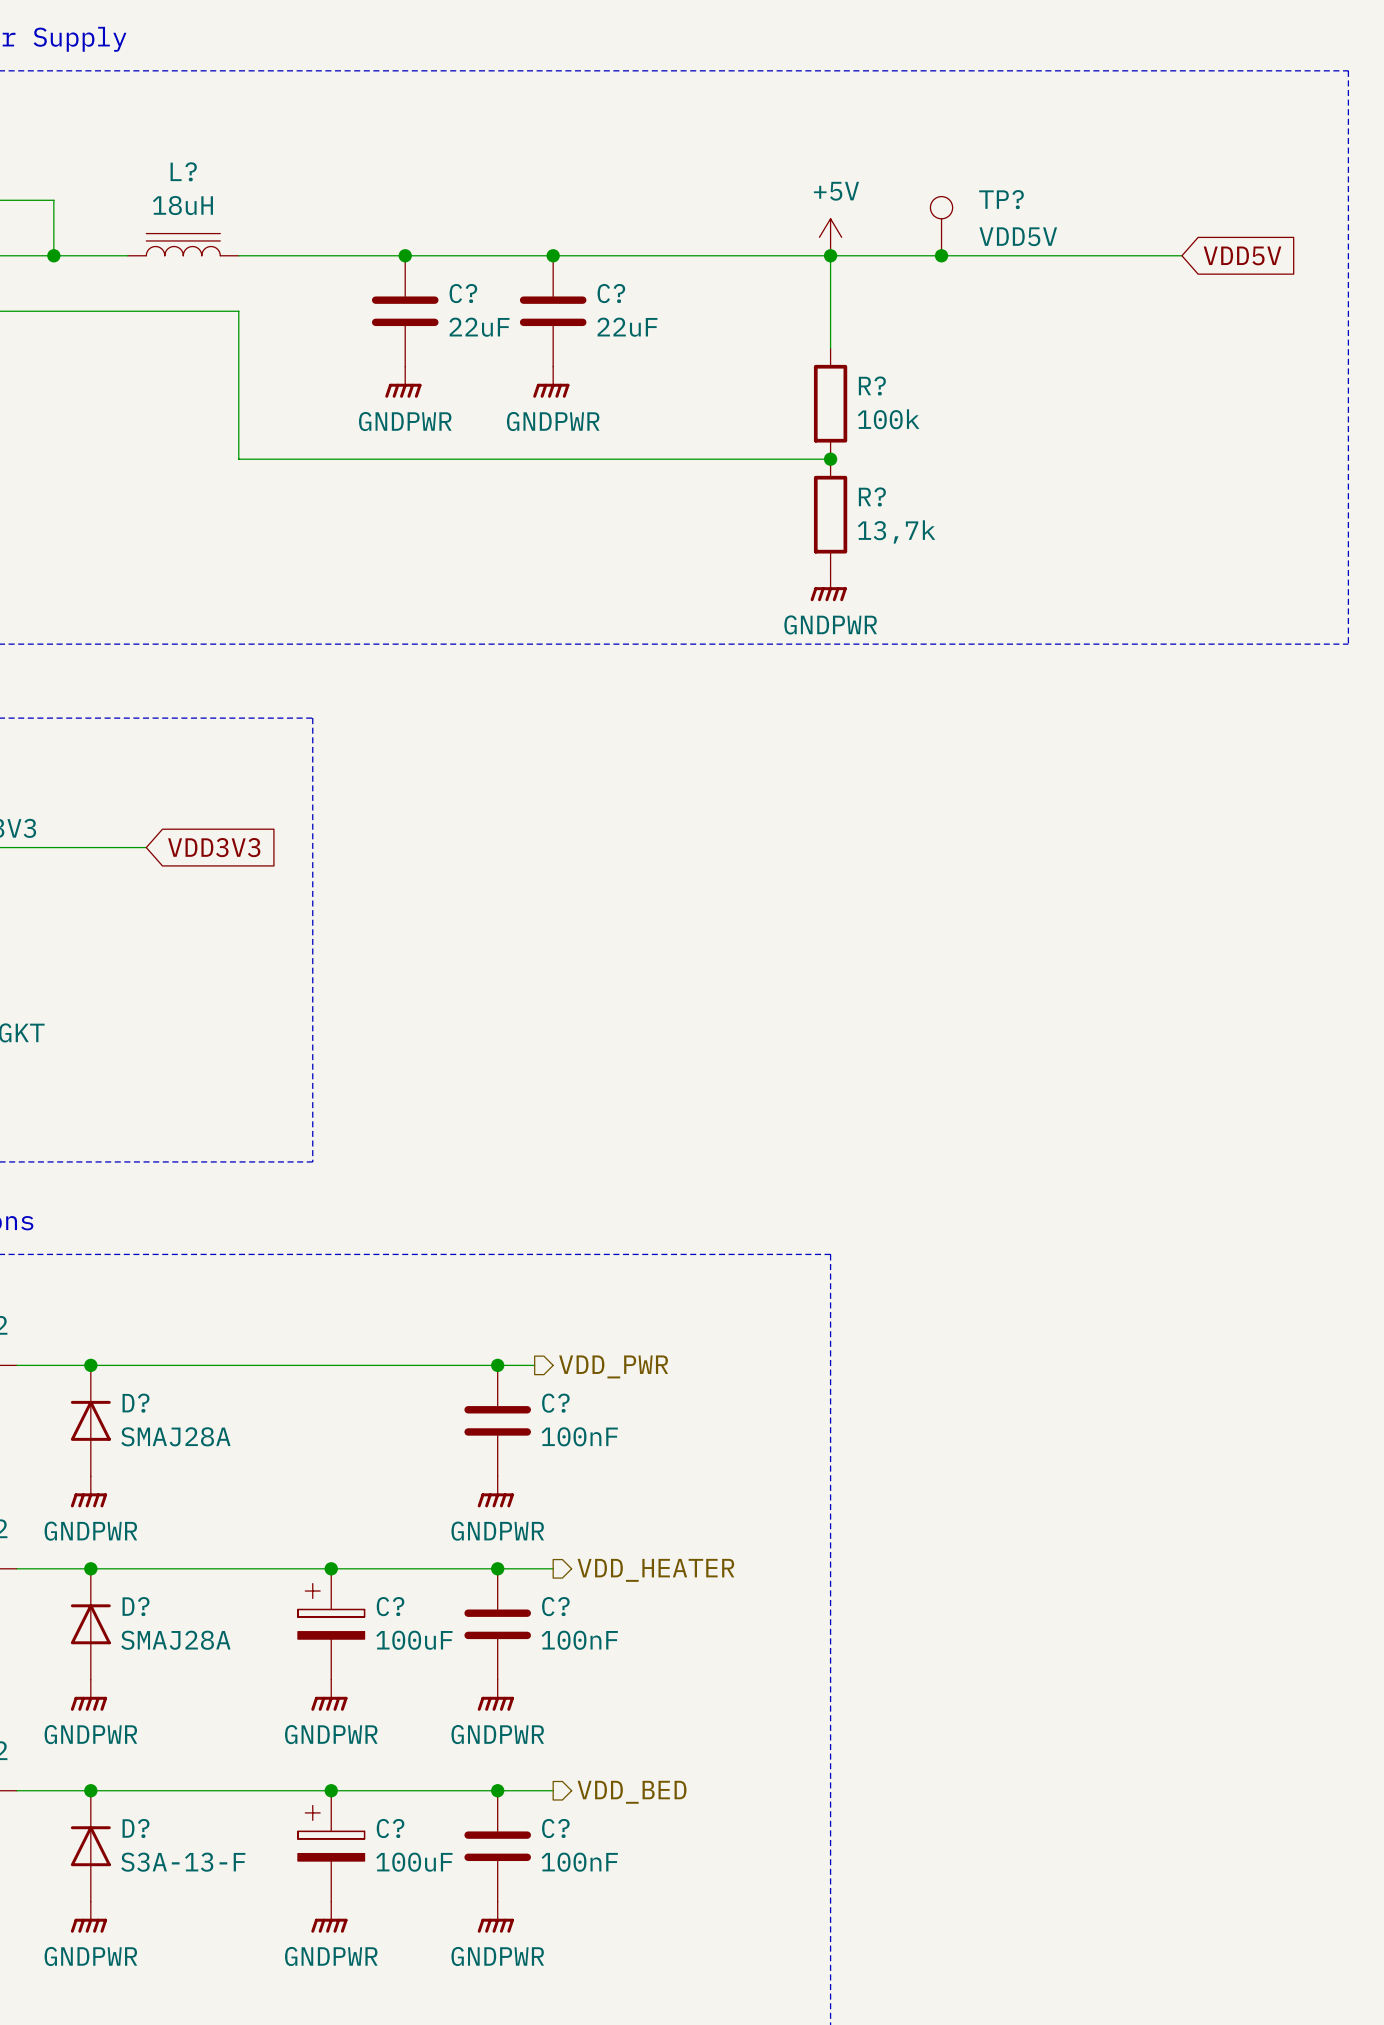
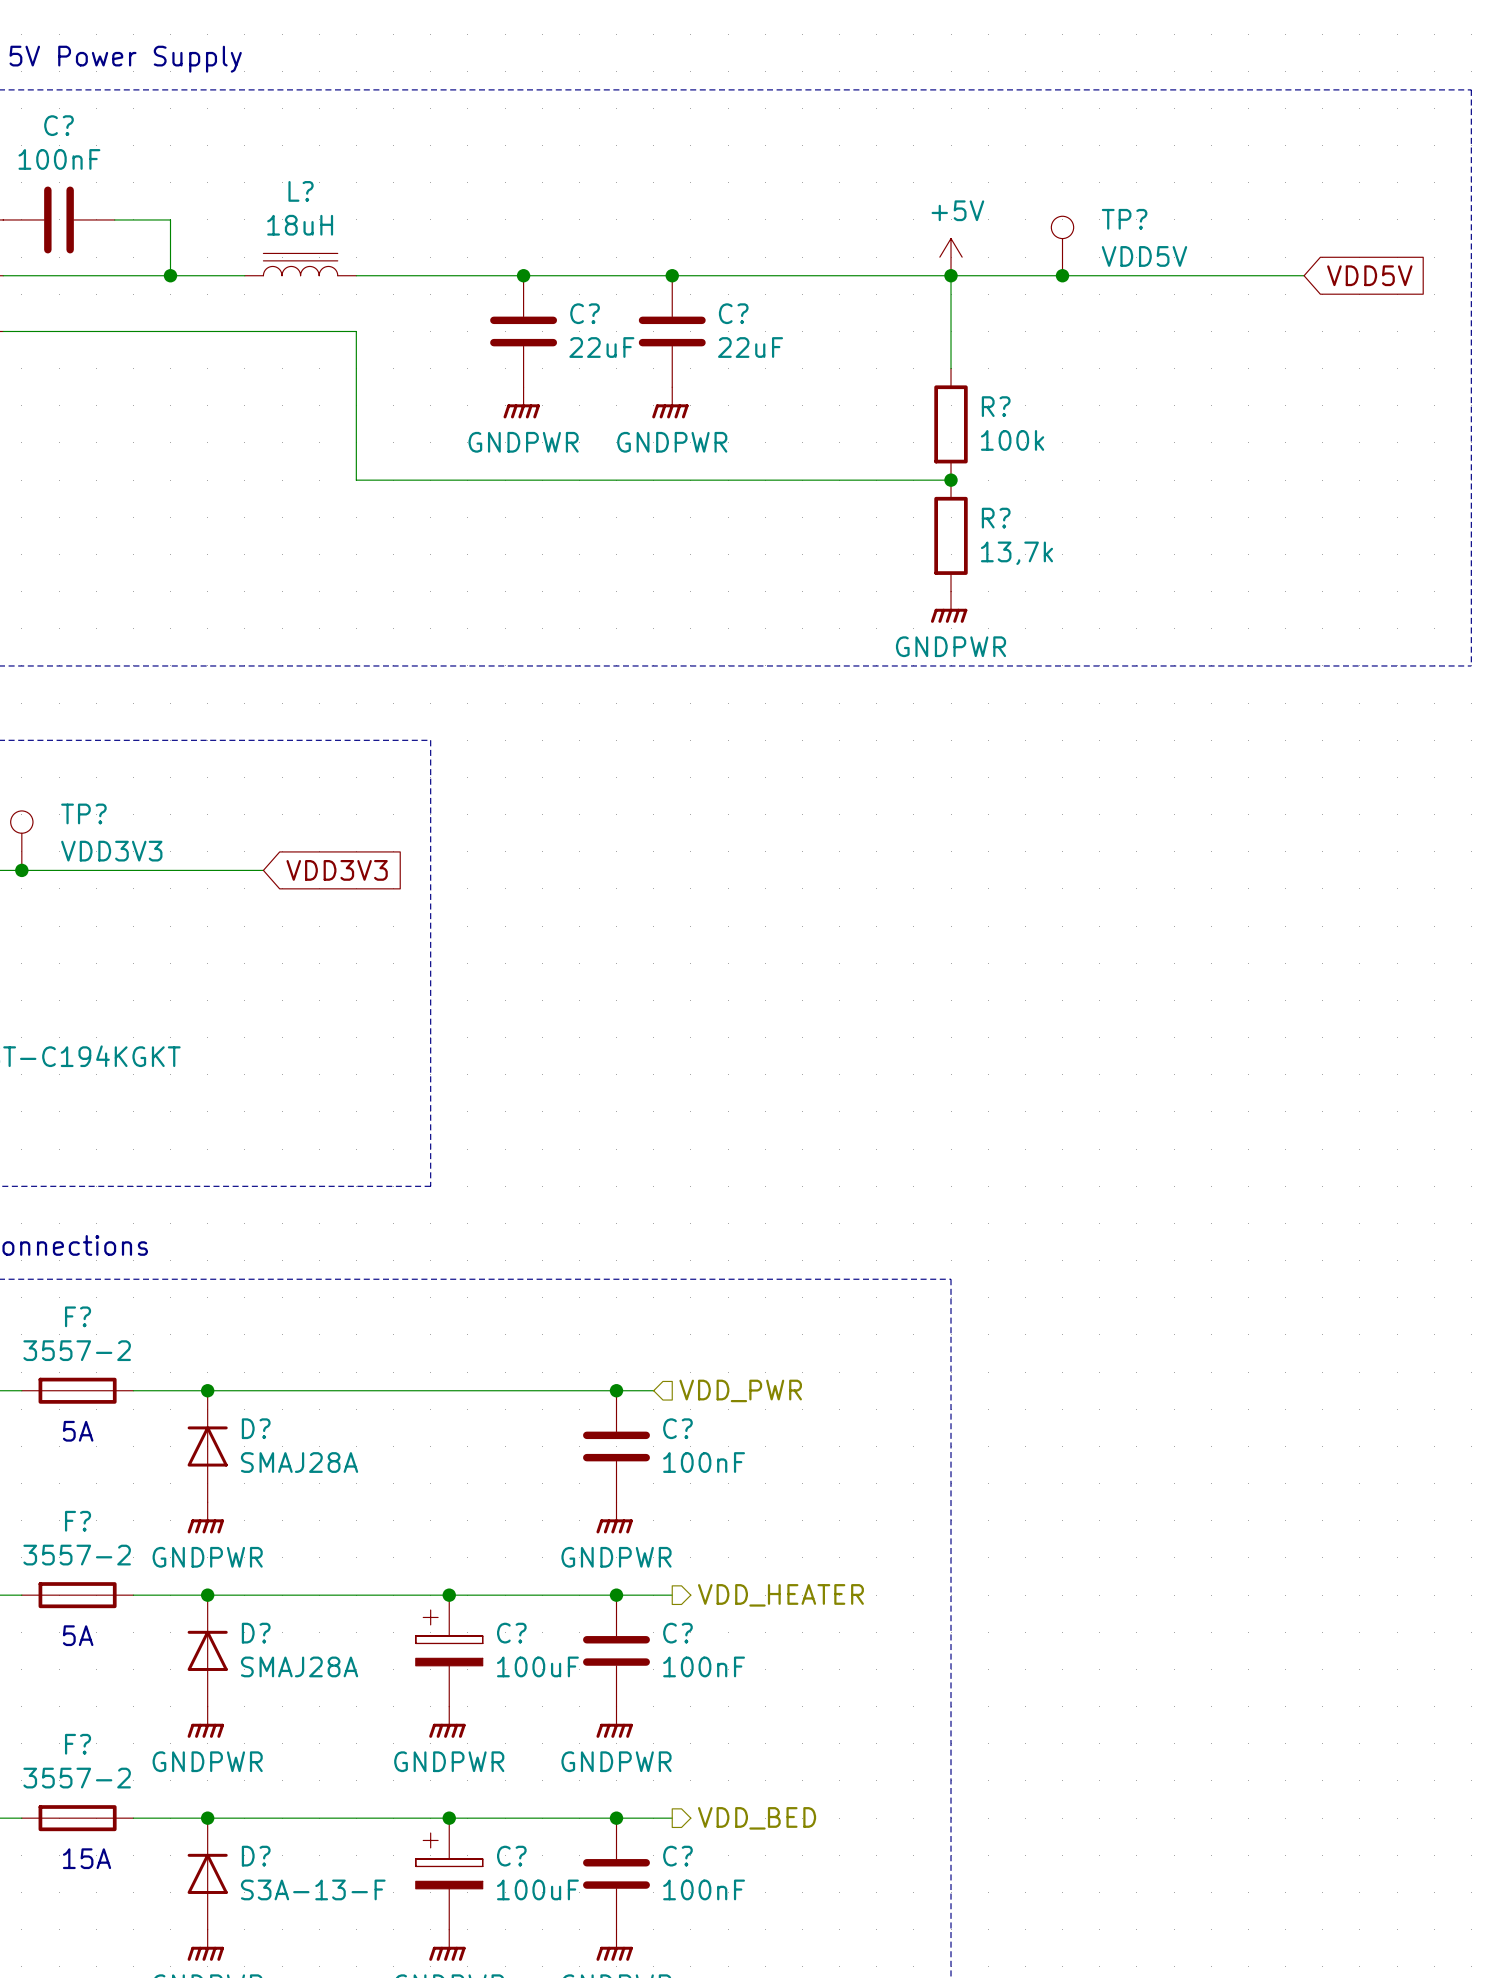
hierarchical label shape: output (613, 1366) -> input (740, 1390)

